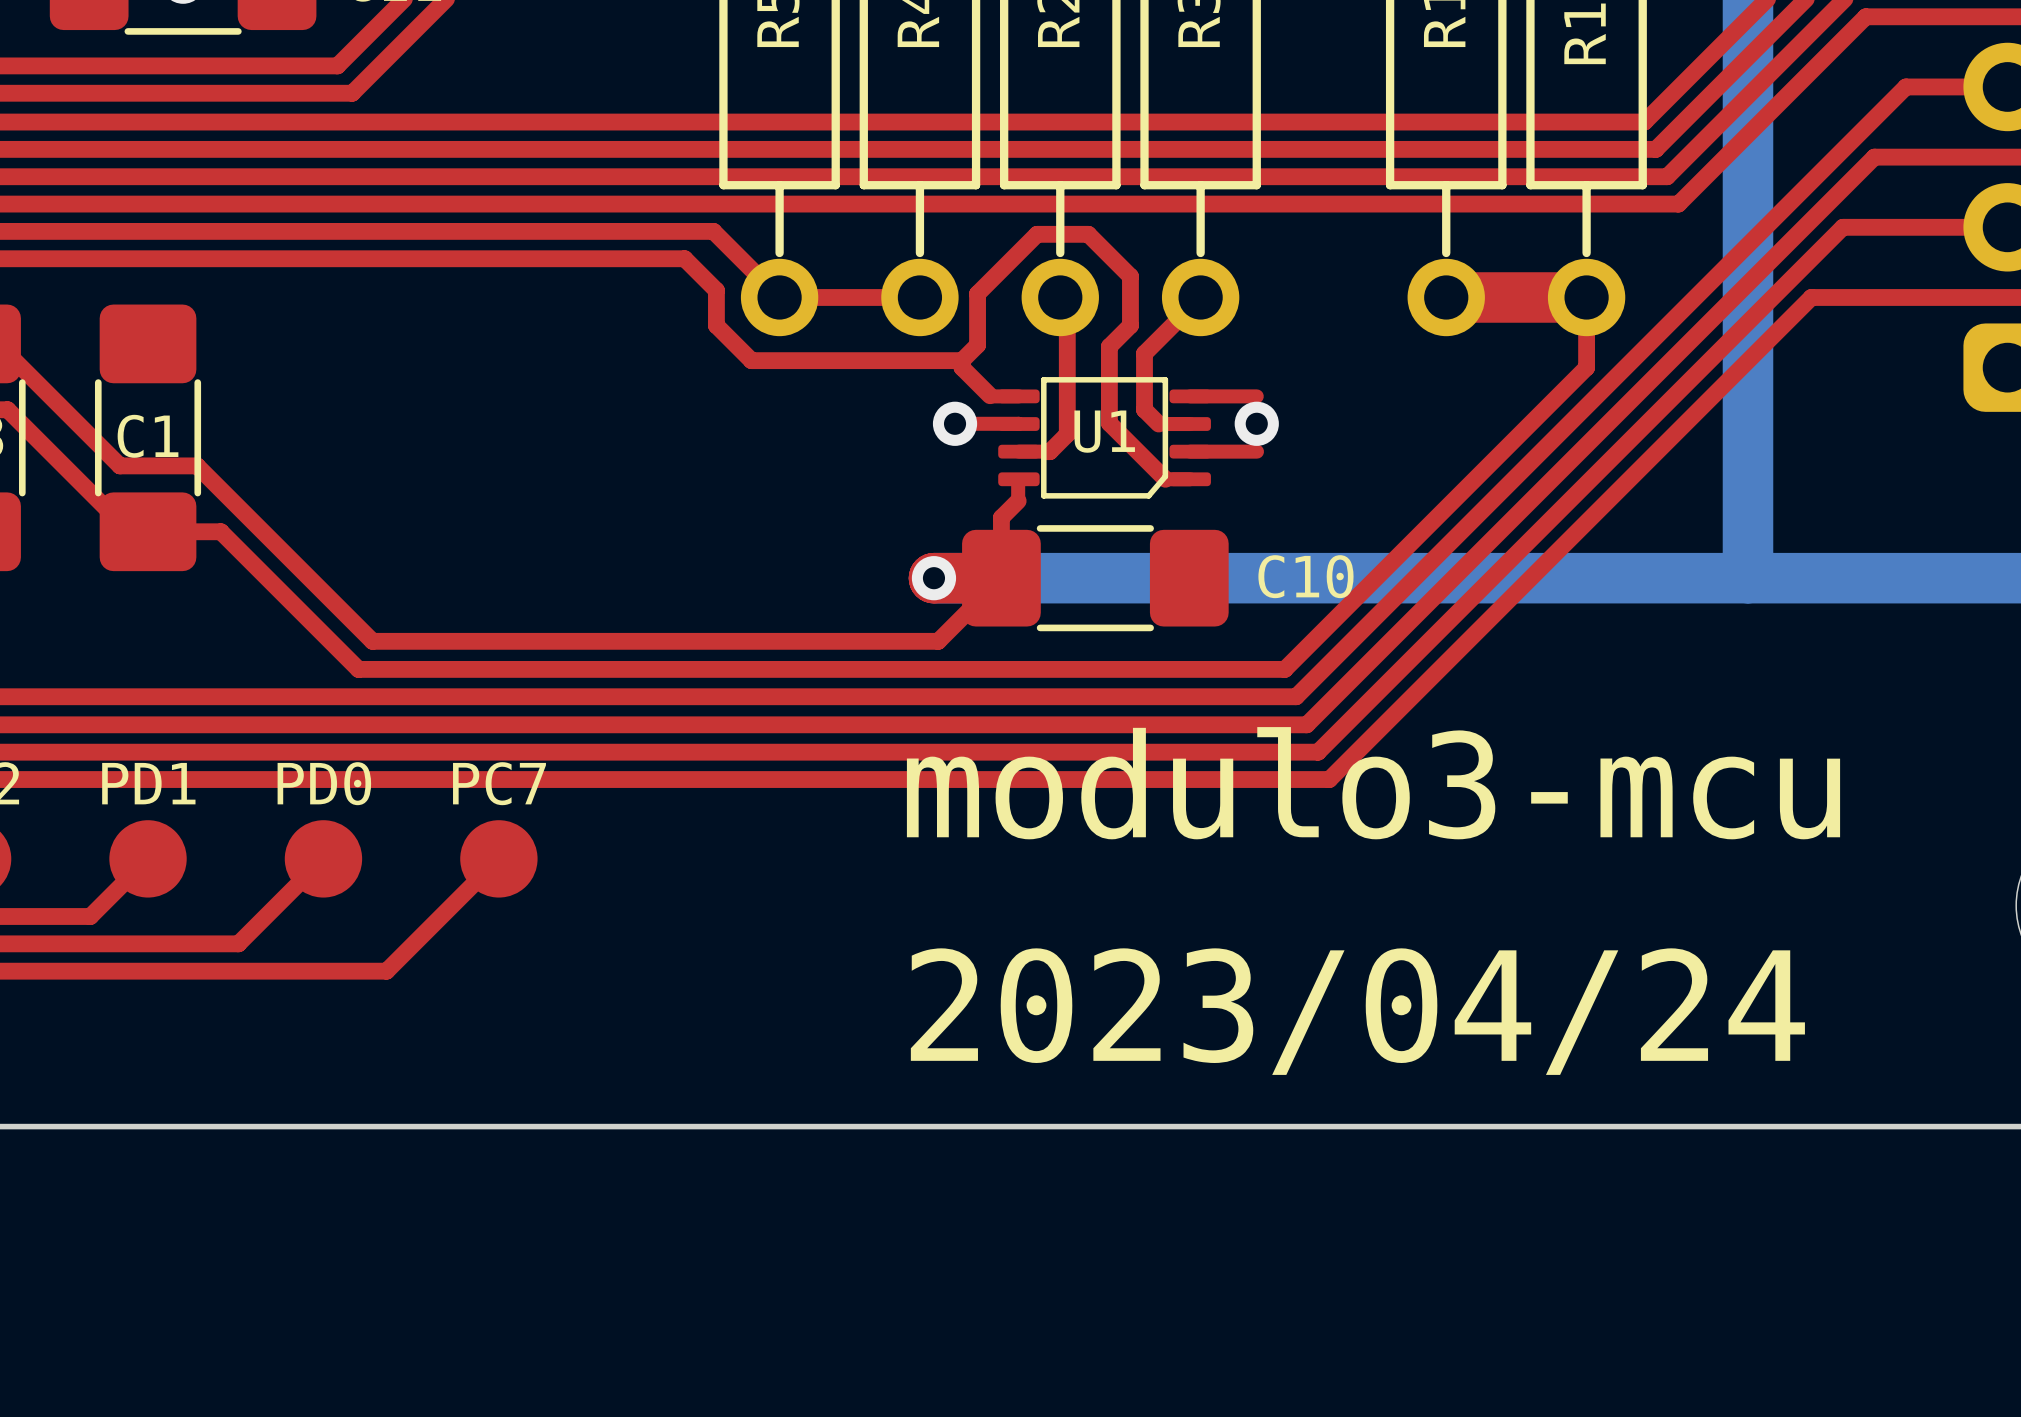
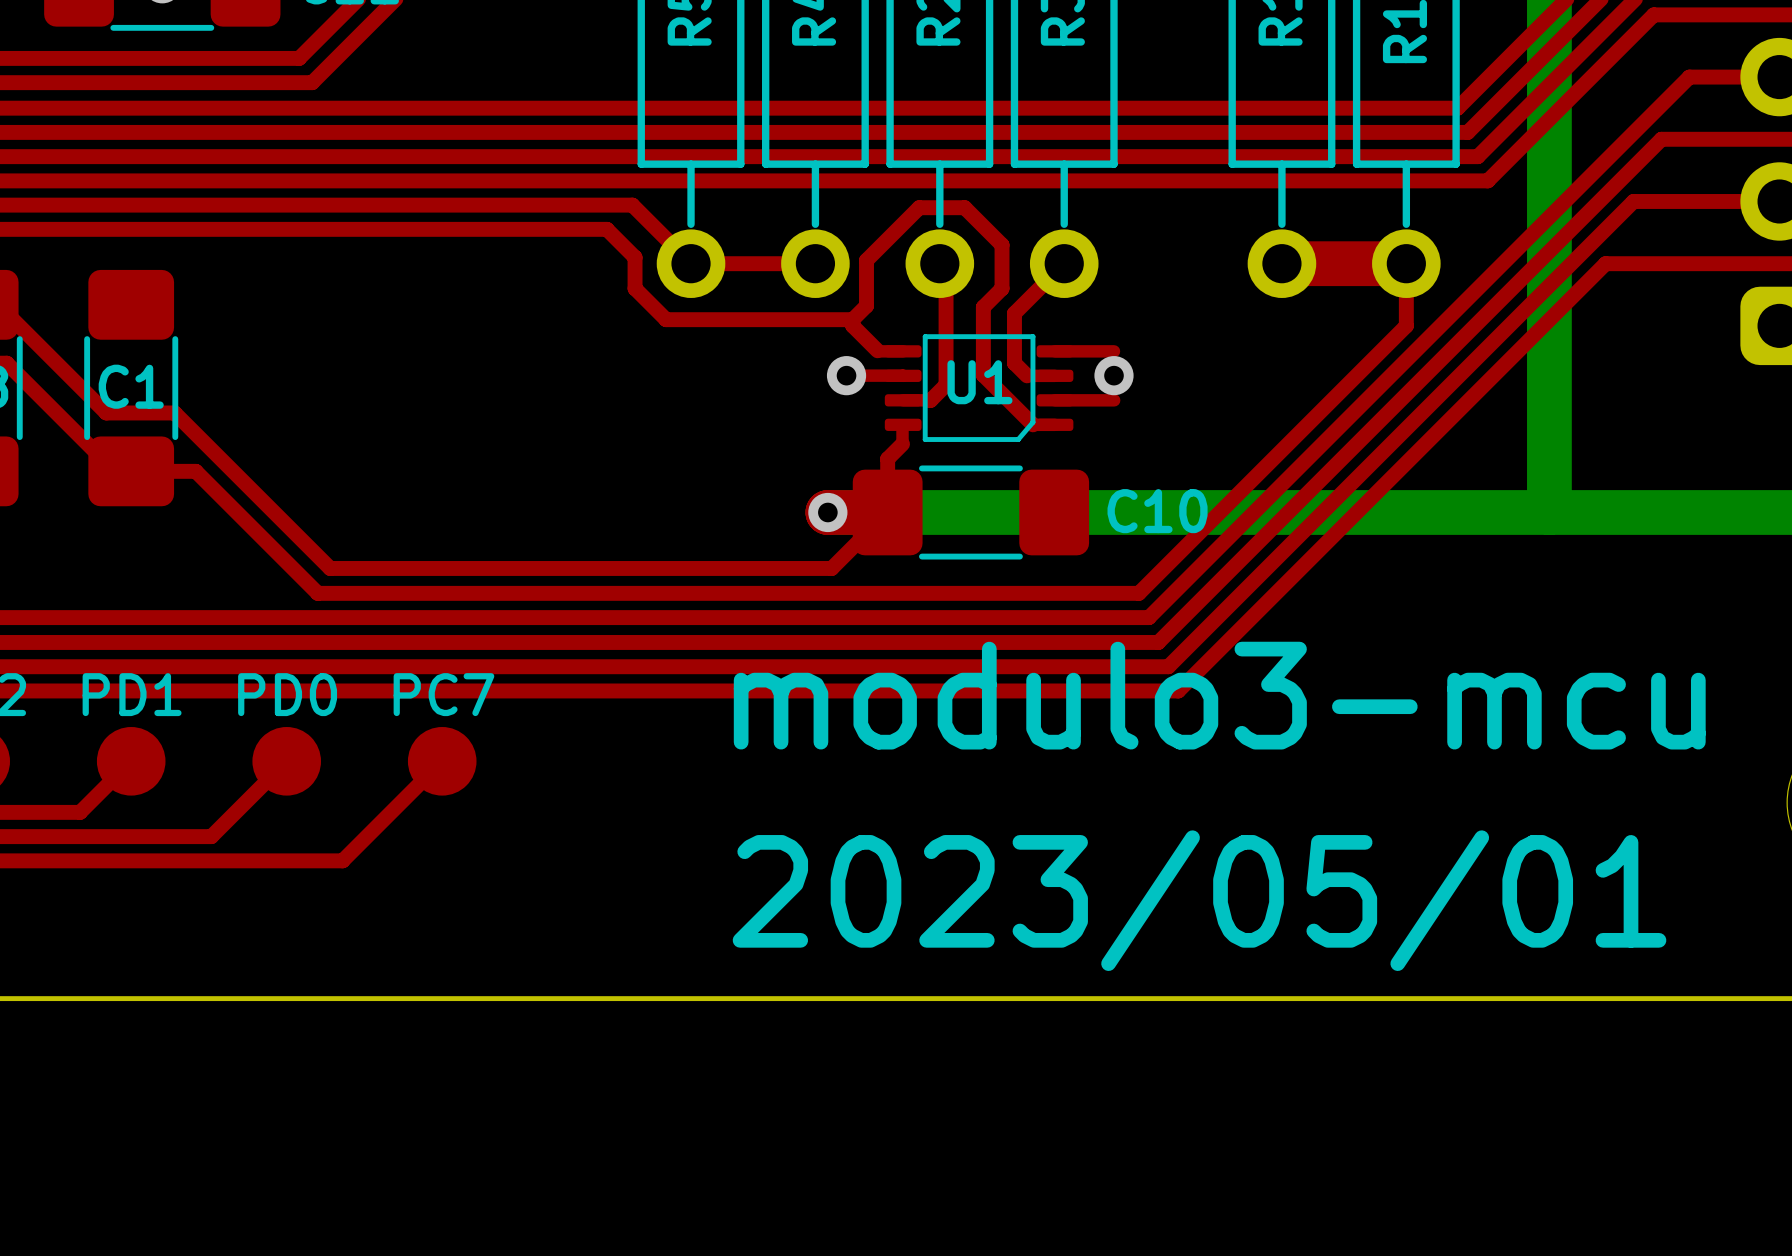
text: 2023/04/24 (1357, 1011) -> 2023/05/01 (1199, 900)

